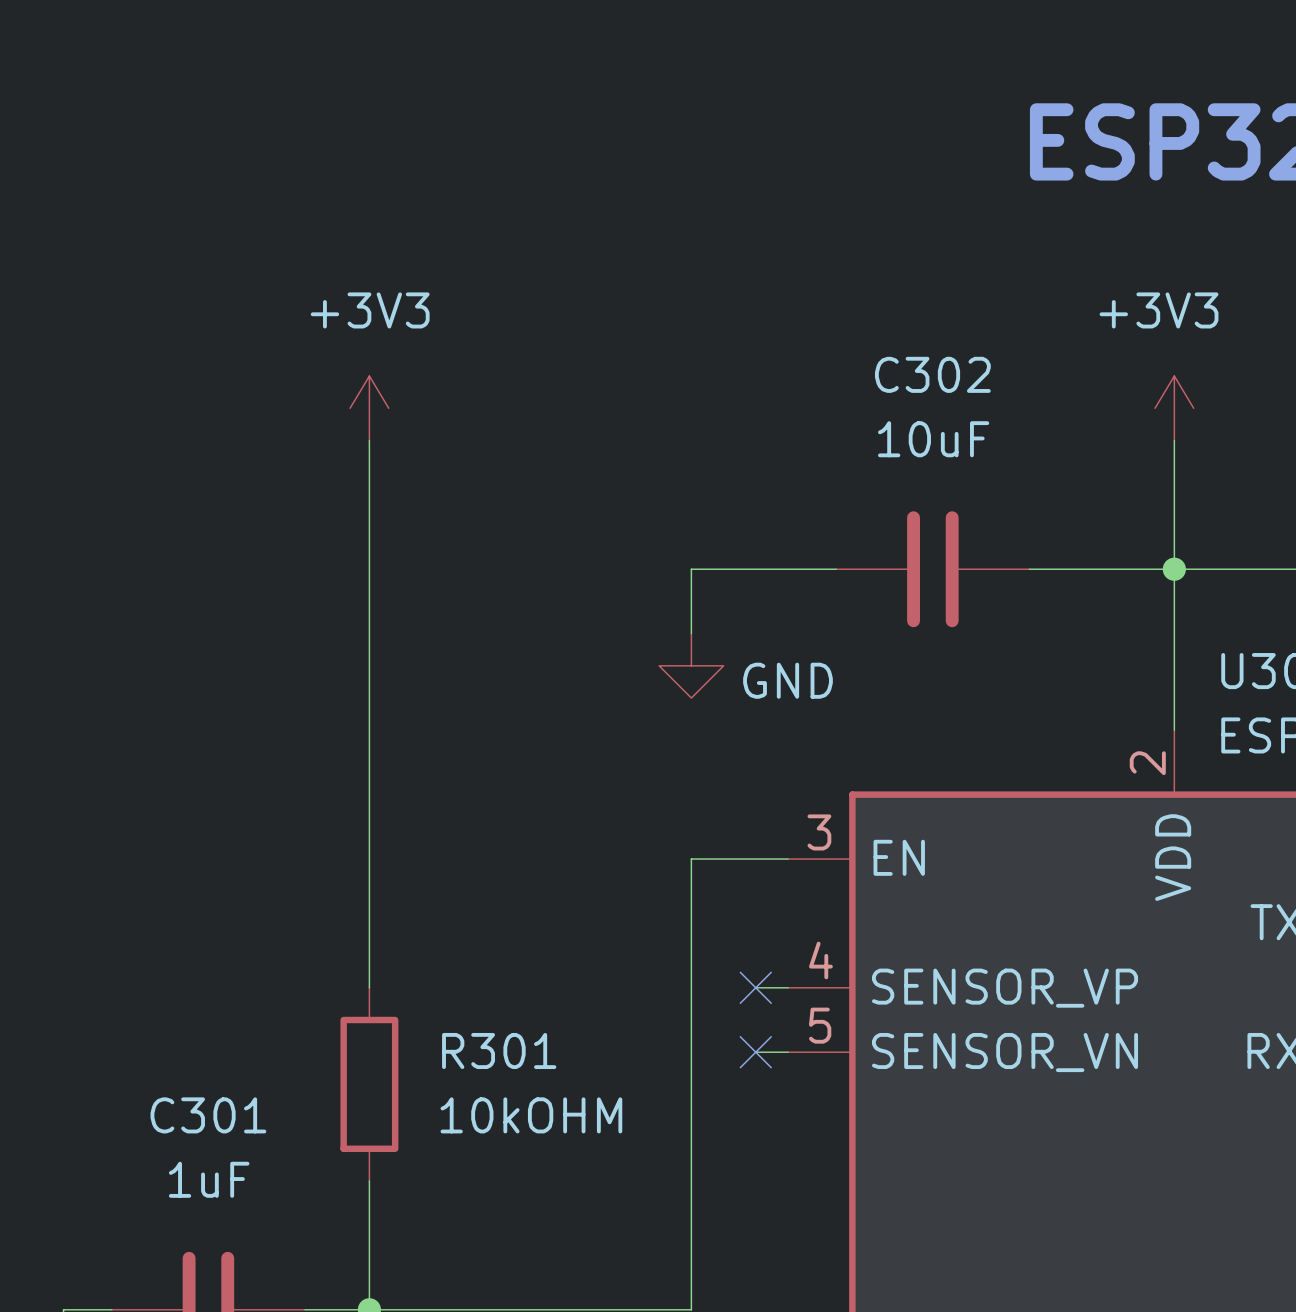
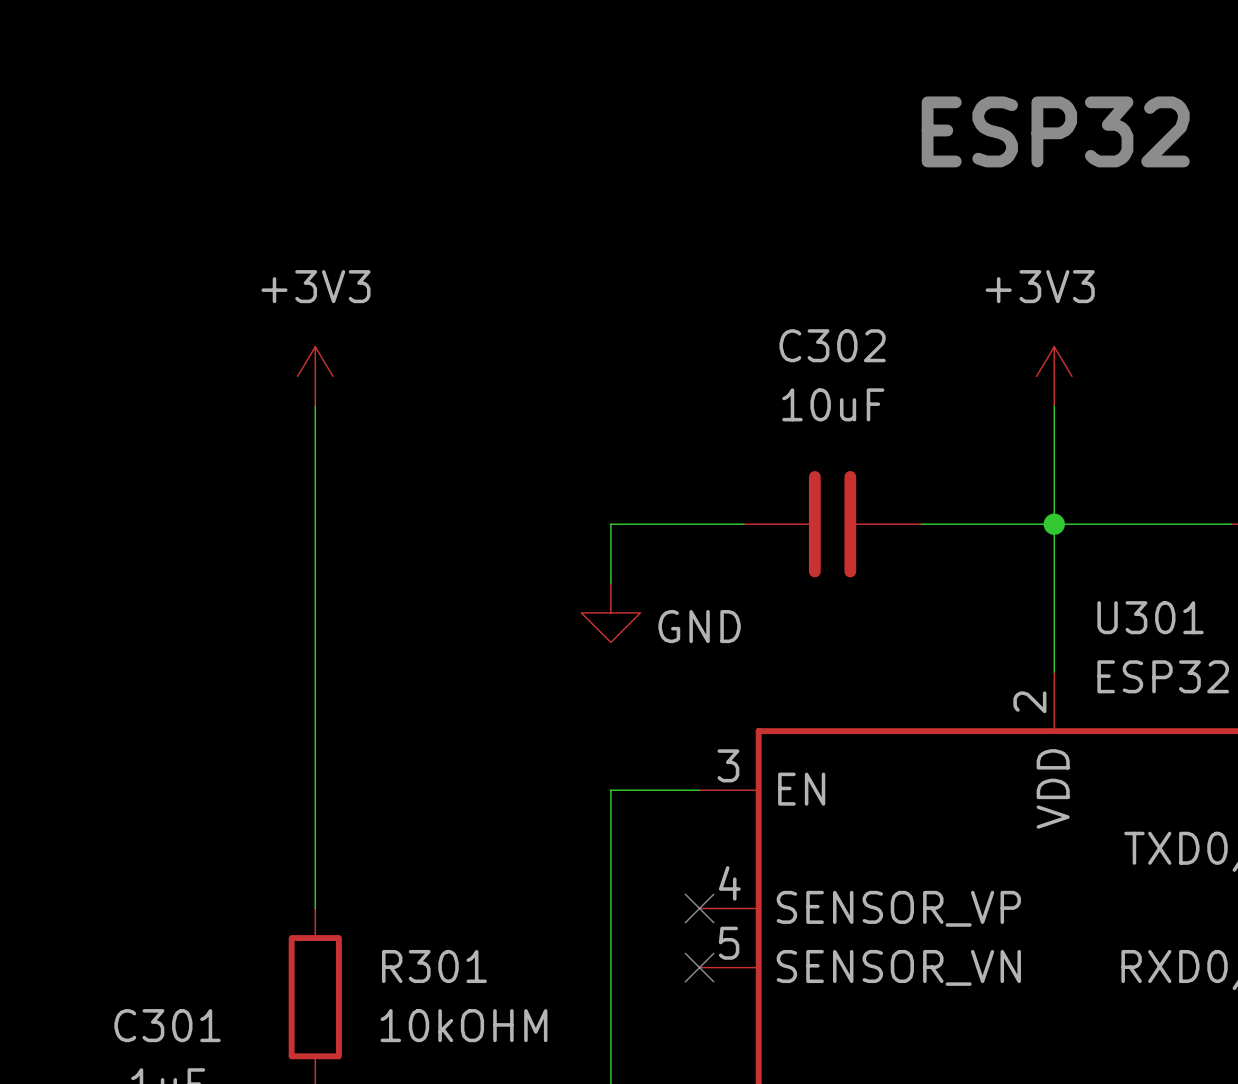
wire: (755, 987) (787, 987) -> none
no-connect mark position: (755, 987) -> (699, 908)
wire: (755, 1052) (787, 1052) -> none
no-connect mark position: (755, 1052) -> (699, 967)

